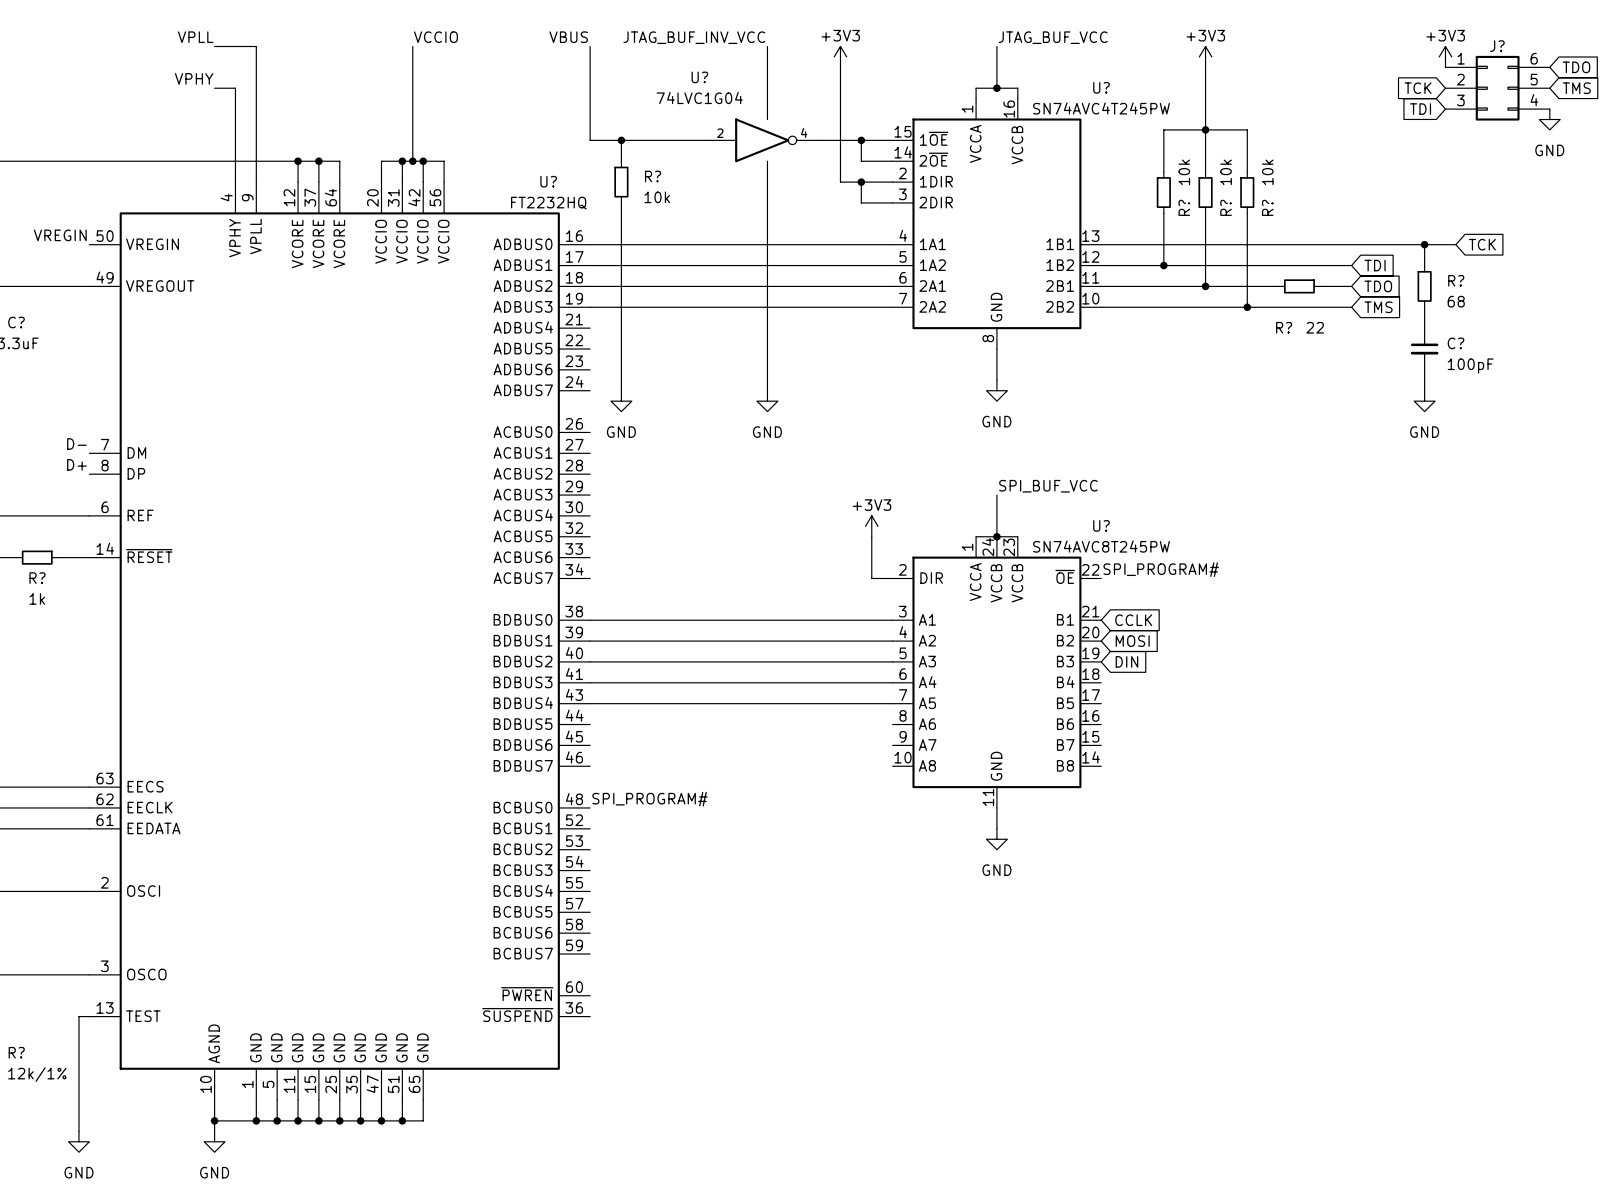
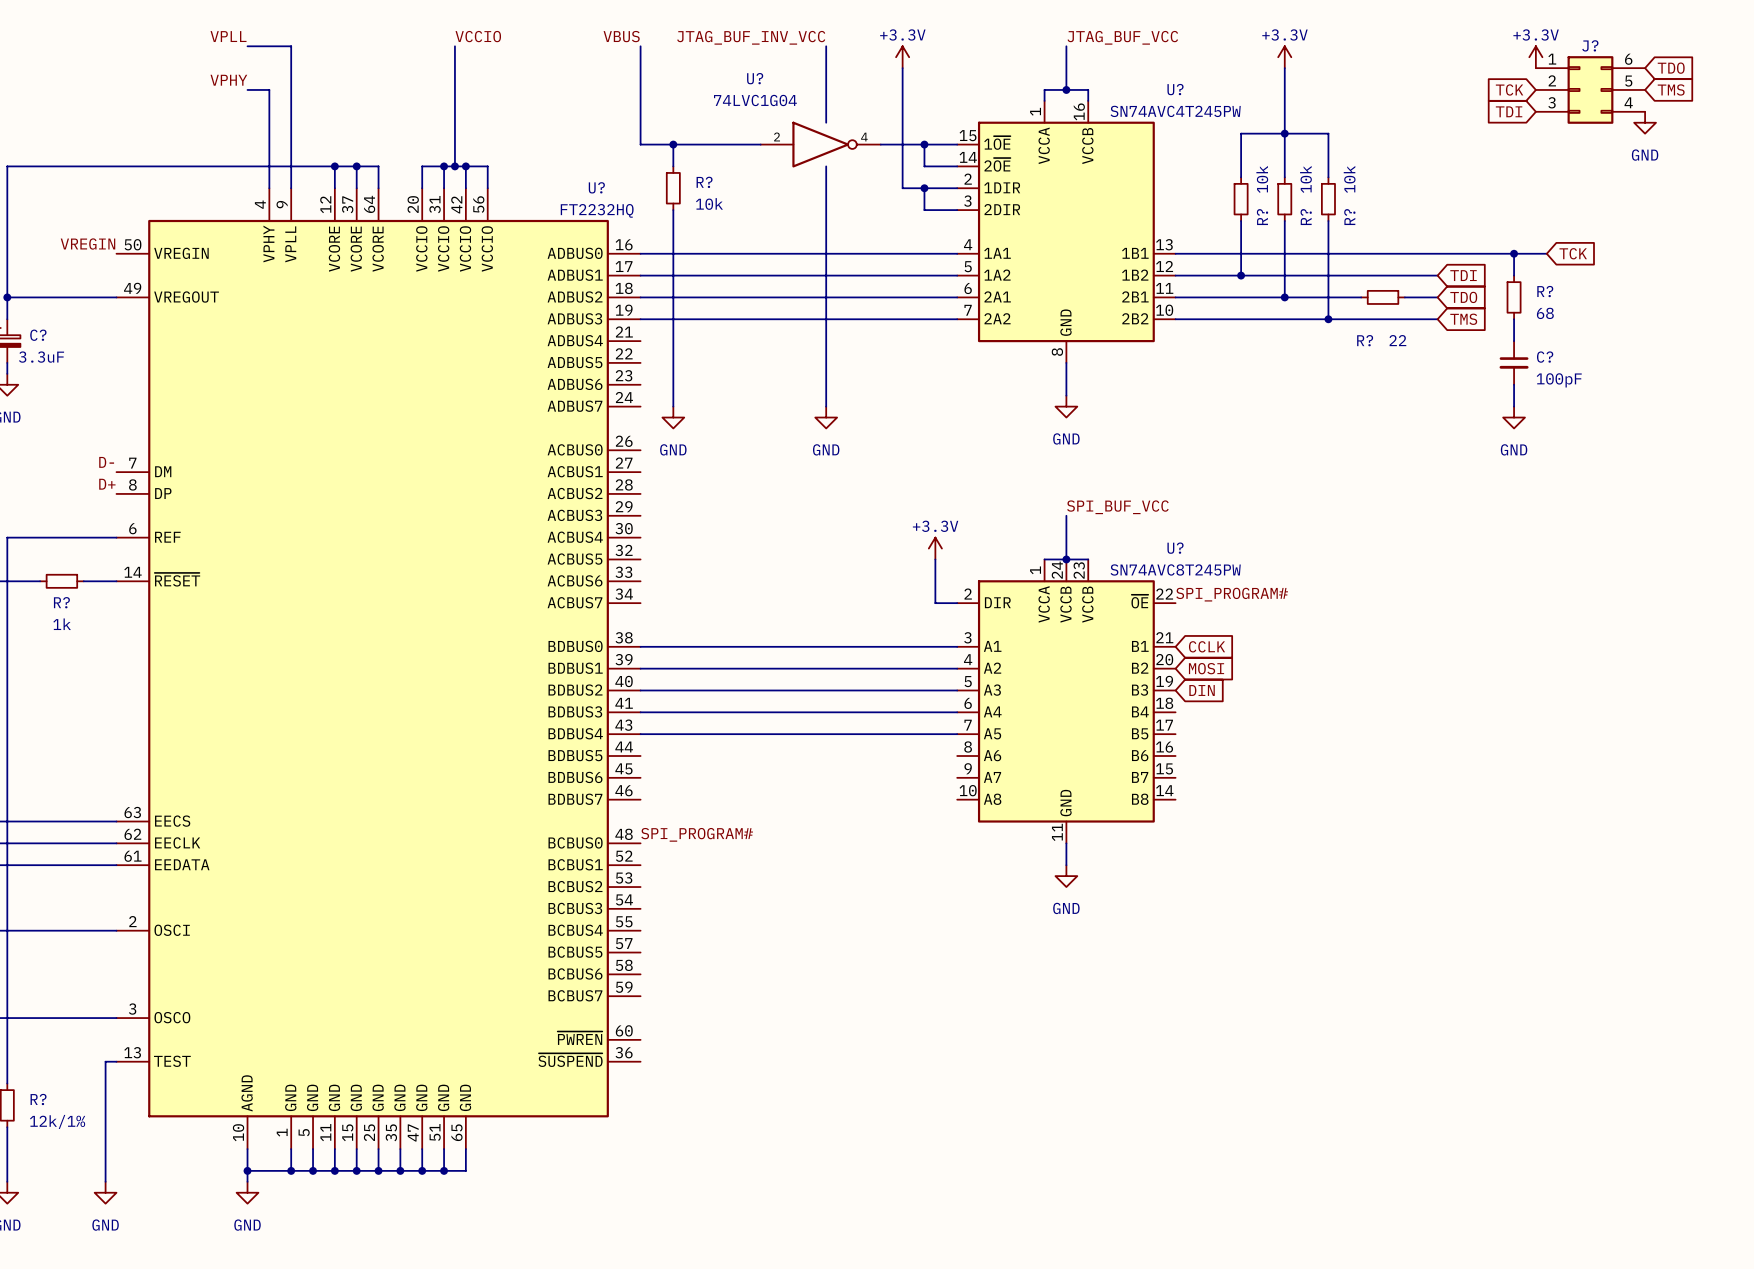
power symbol: +3V3 (840, 56) -> +3.3V (902, 57)
power symbol: +3V3 (1205, 56) -> +3.3V (1284, 57)
power symbol: +3V3 (1445, 56) -> +3.3V (1535, 57)
power symbol: +3V3 (871, 526) -> +3.3V (935, 548)

